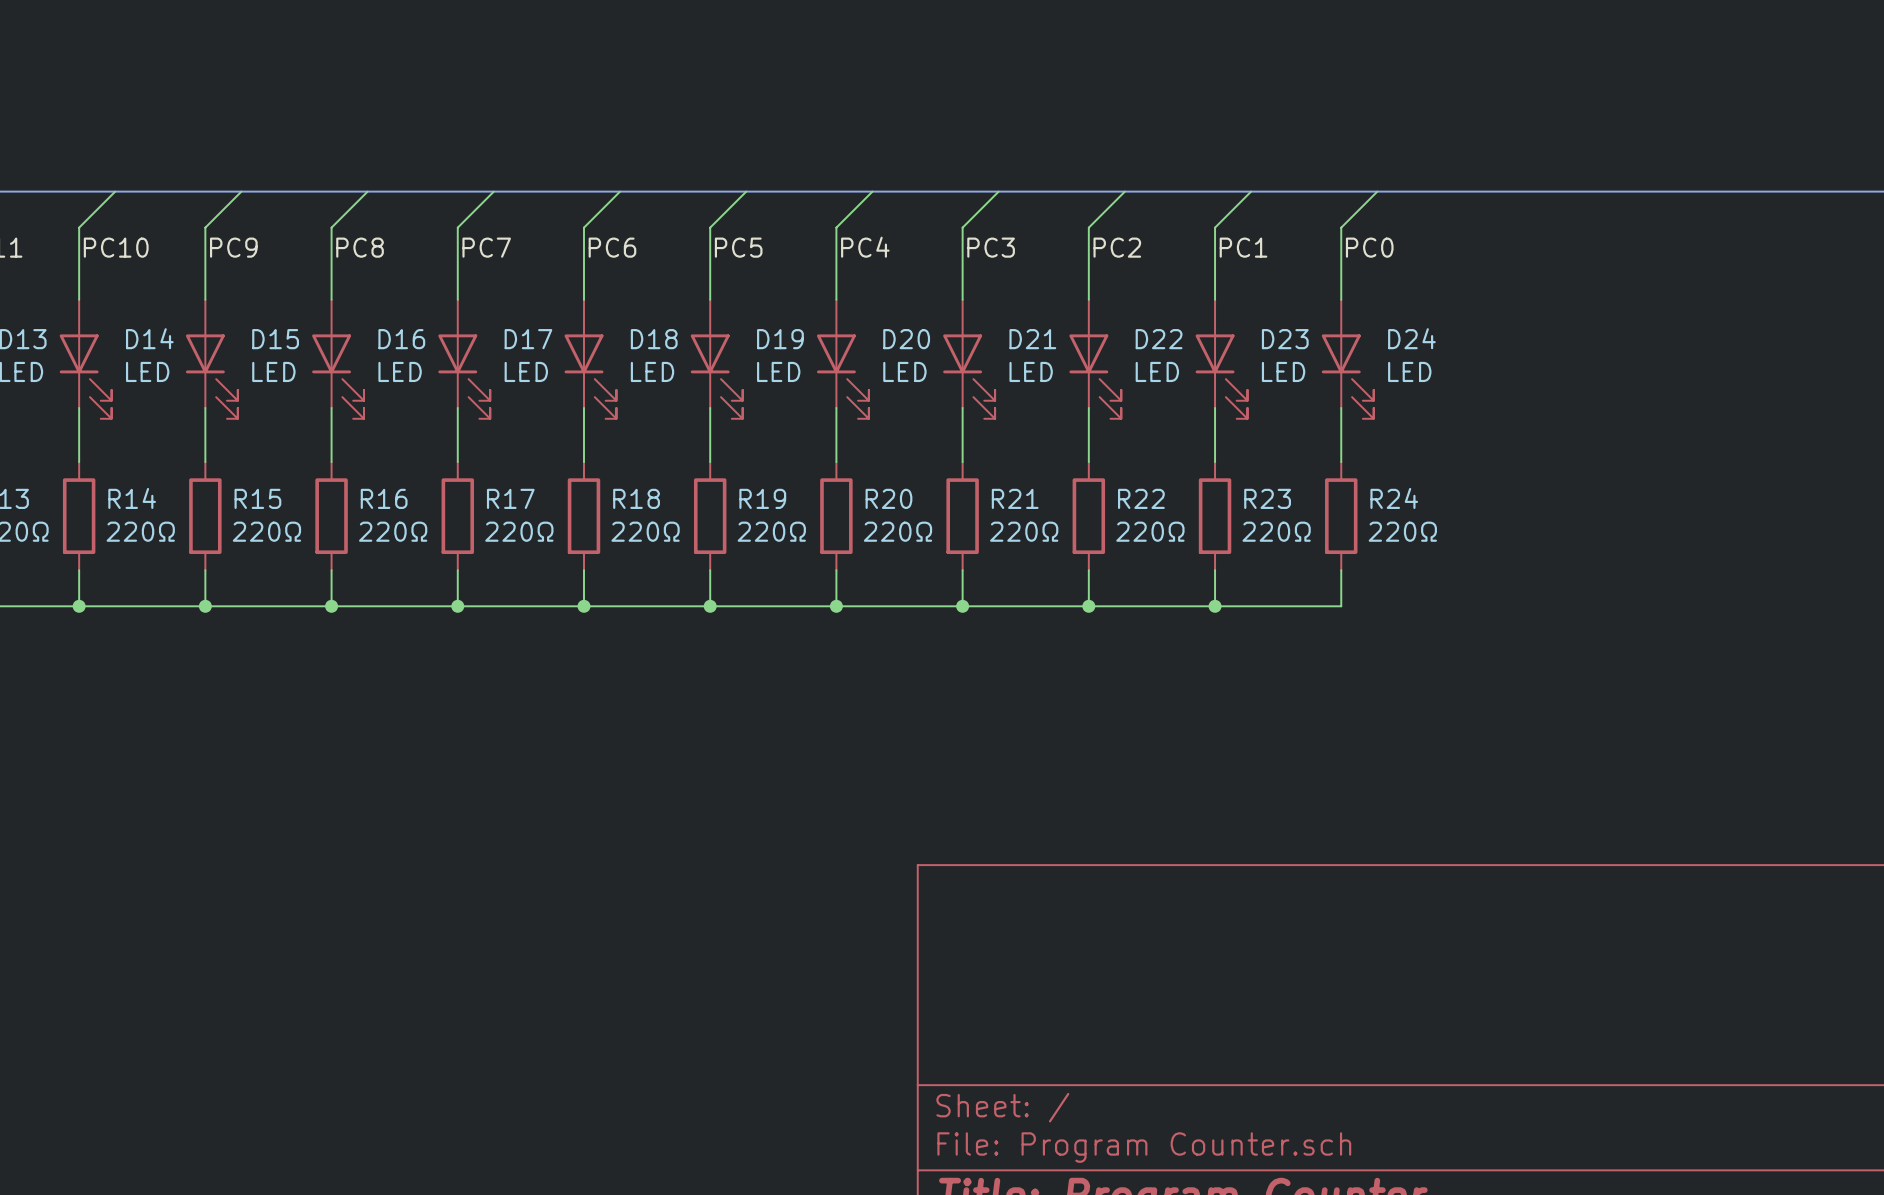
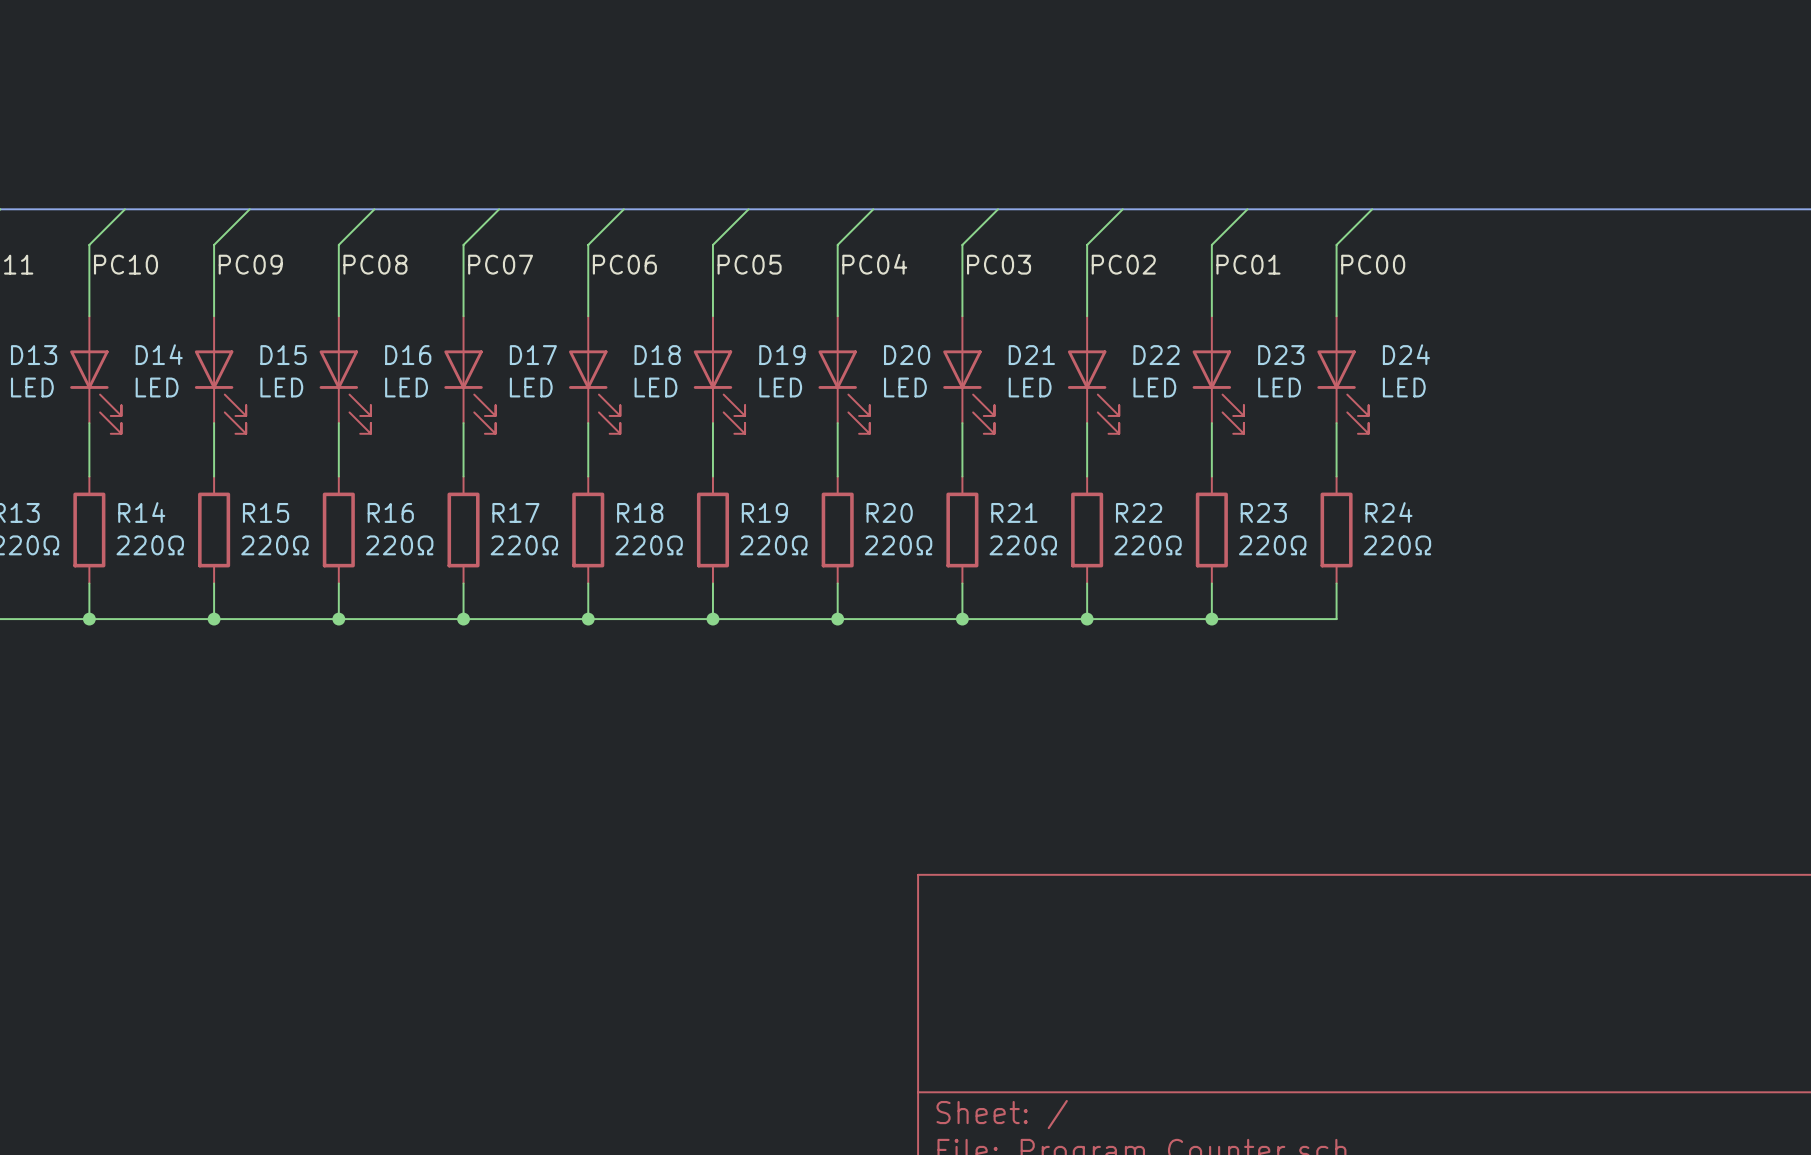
label: PC9 (233, 247) -> PC09 (250, 264)
label: PC8 (360, 247) -> PC08 (375, 264)
label: PC7 (486, 247) -> PC07 (500, 264)
label: PC6 (612, 247) -> PC06 (624, 264)
label: PC5 (738, 247) -> PC05 (749, 264)
label: PC4 (865, 247) -> PC04 (874, 264)
label: PC3 (991, 247) -> PC03 (999, 264)
label: PC2 (1117, 247) -> PC02 (1123, 264)
label: PC1 (1243, 247) -> PC01 (1248, 264)
label: PC0 (1369, 247) -> PC00 (1373, 264)

